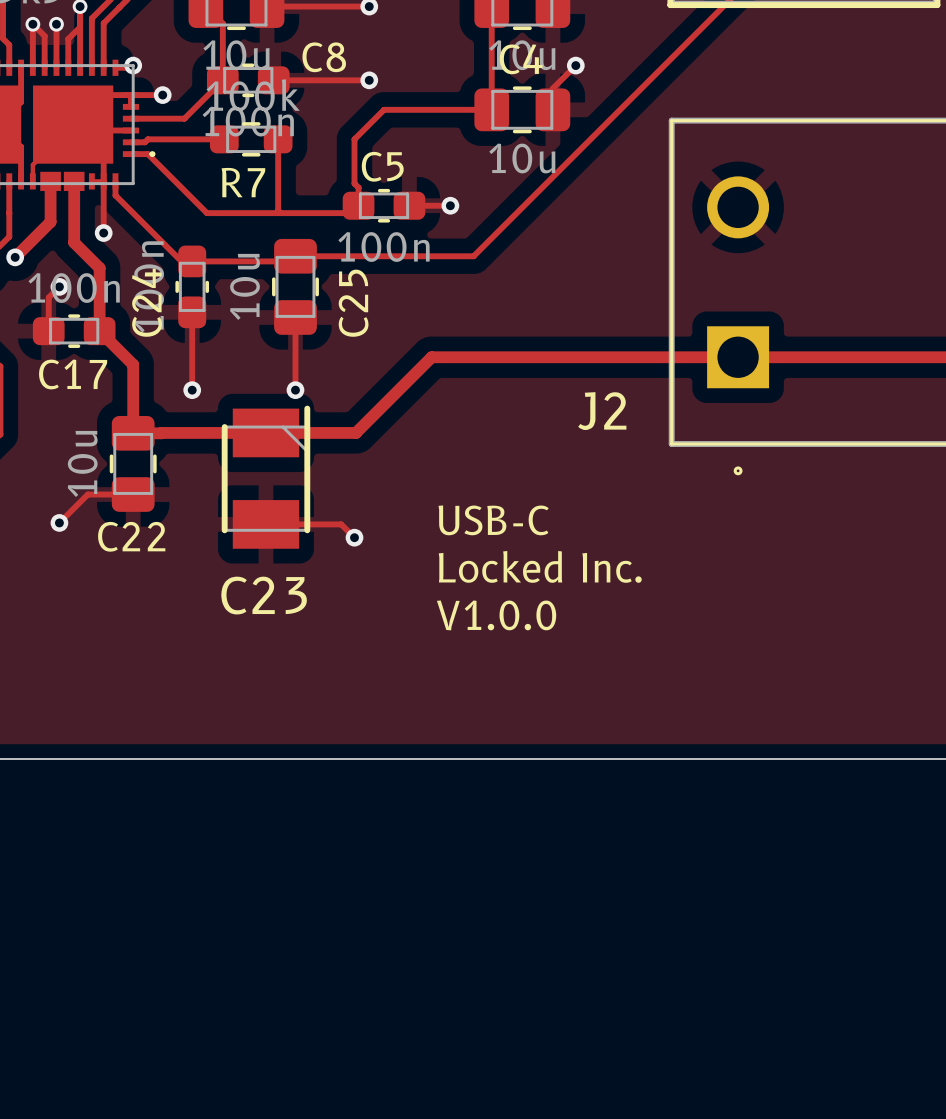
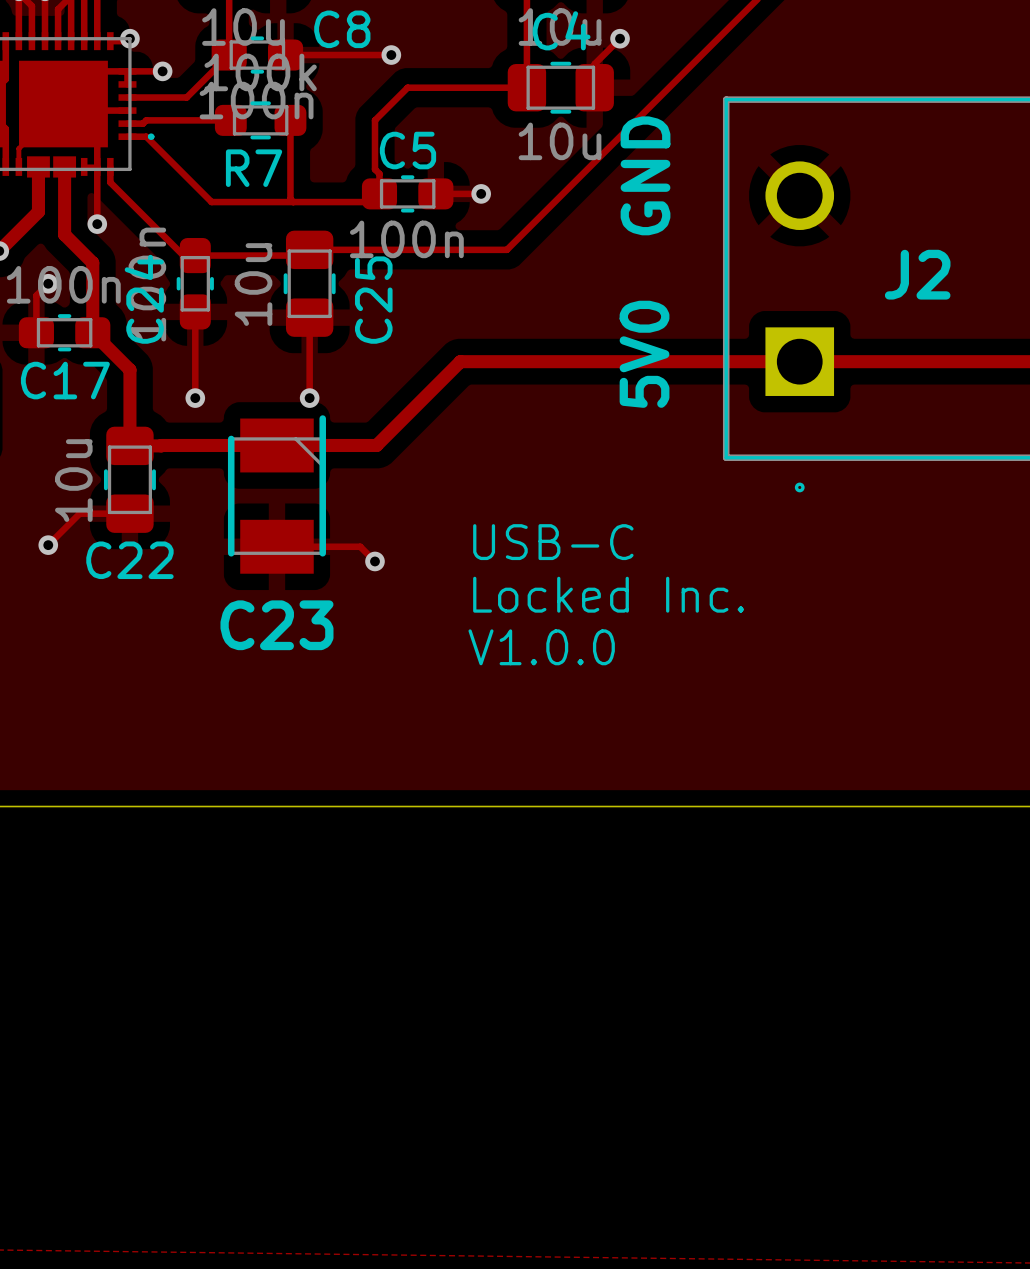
text: none -> GND (645, 175)
text: none -> 5V0 (644, 354)
J2 name position: J2 (602, 411) -> J2 (917, 274)

